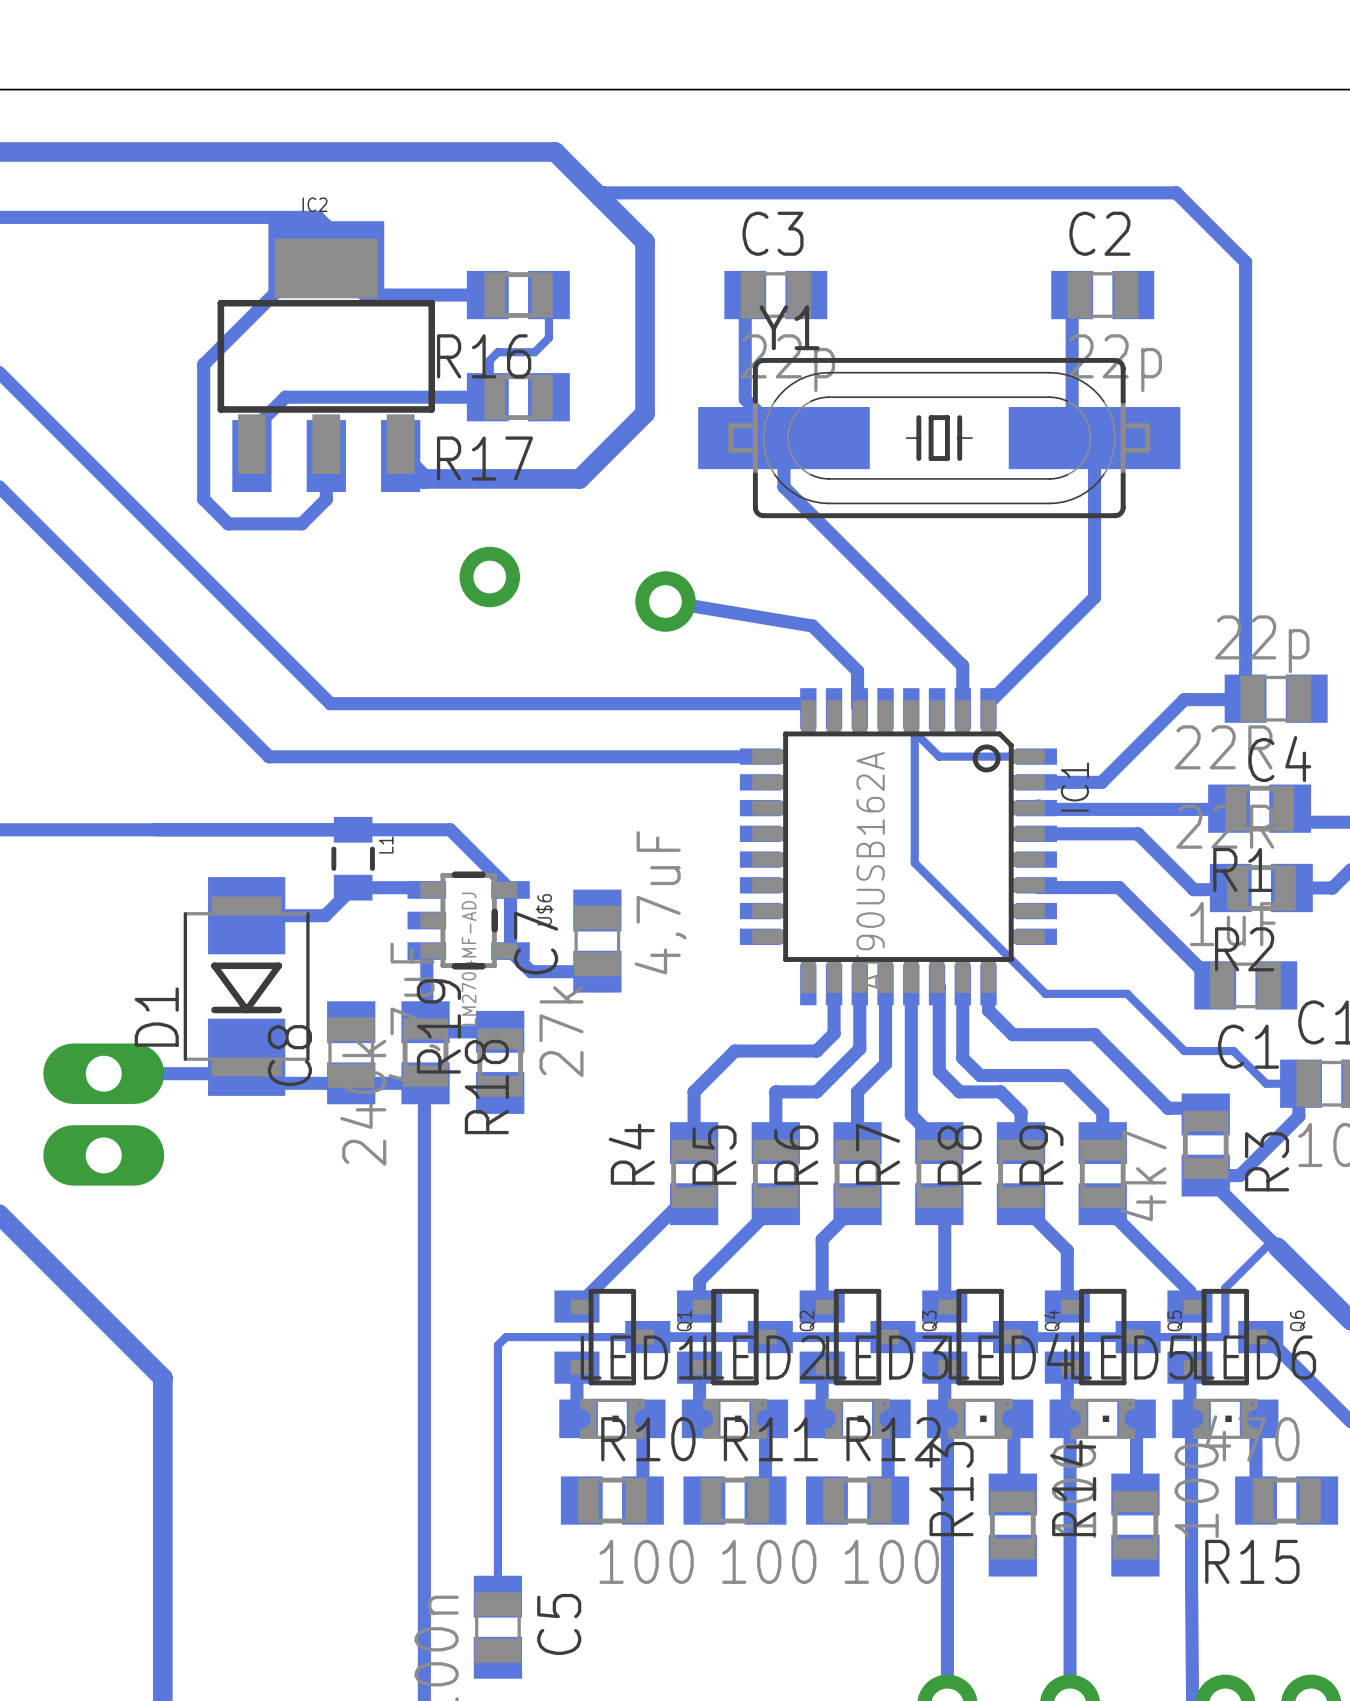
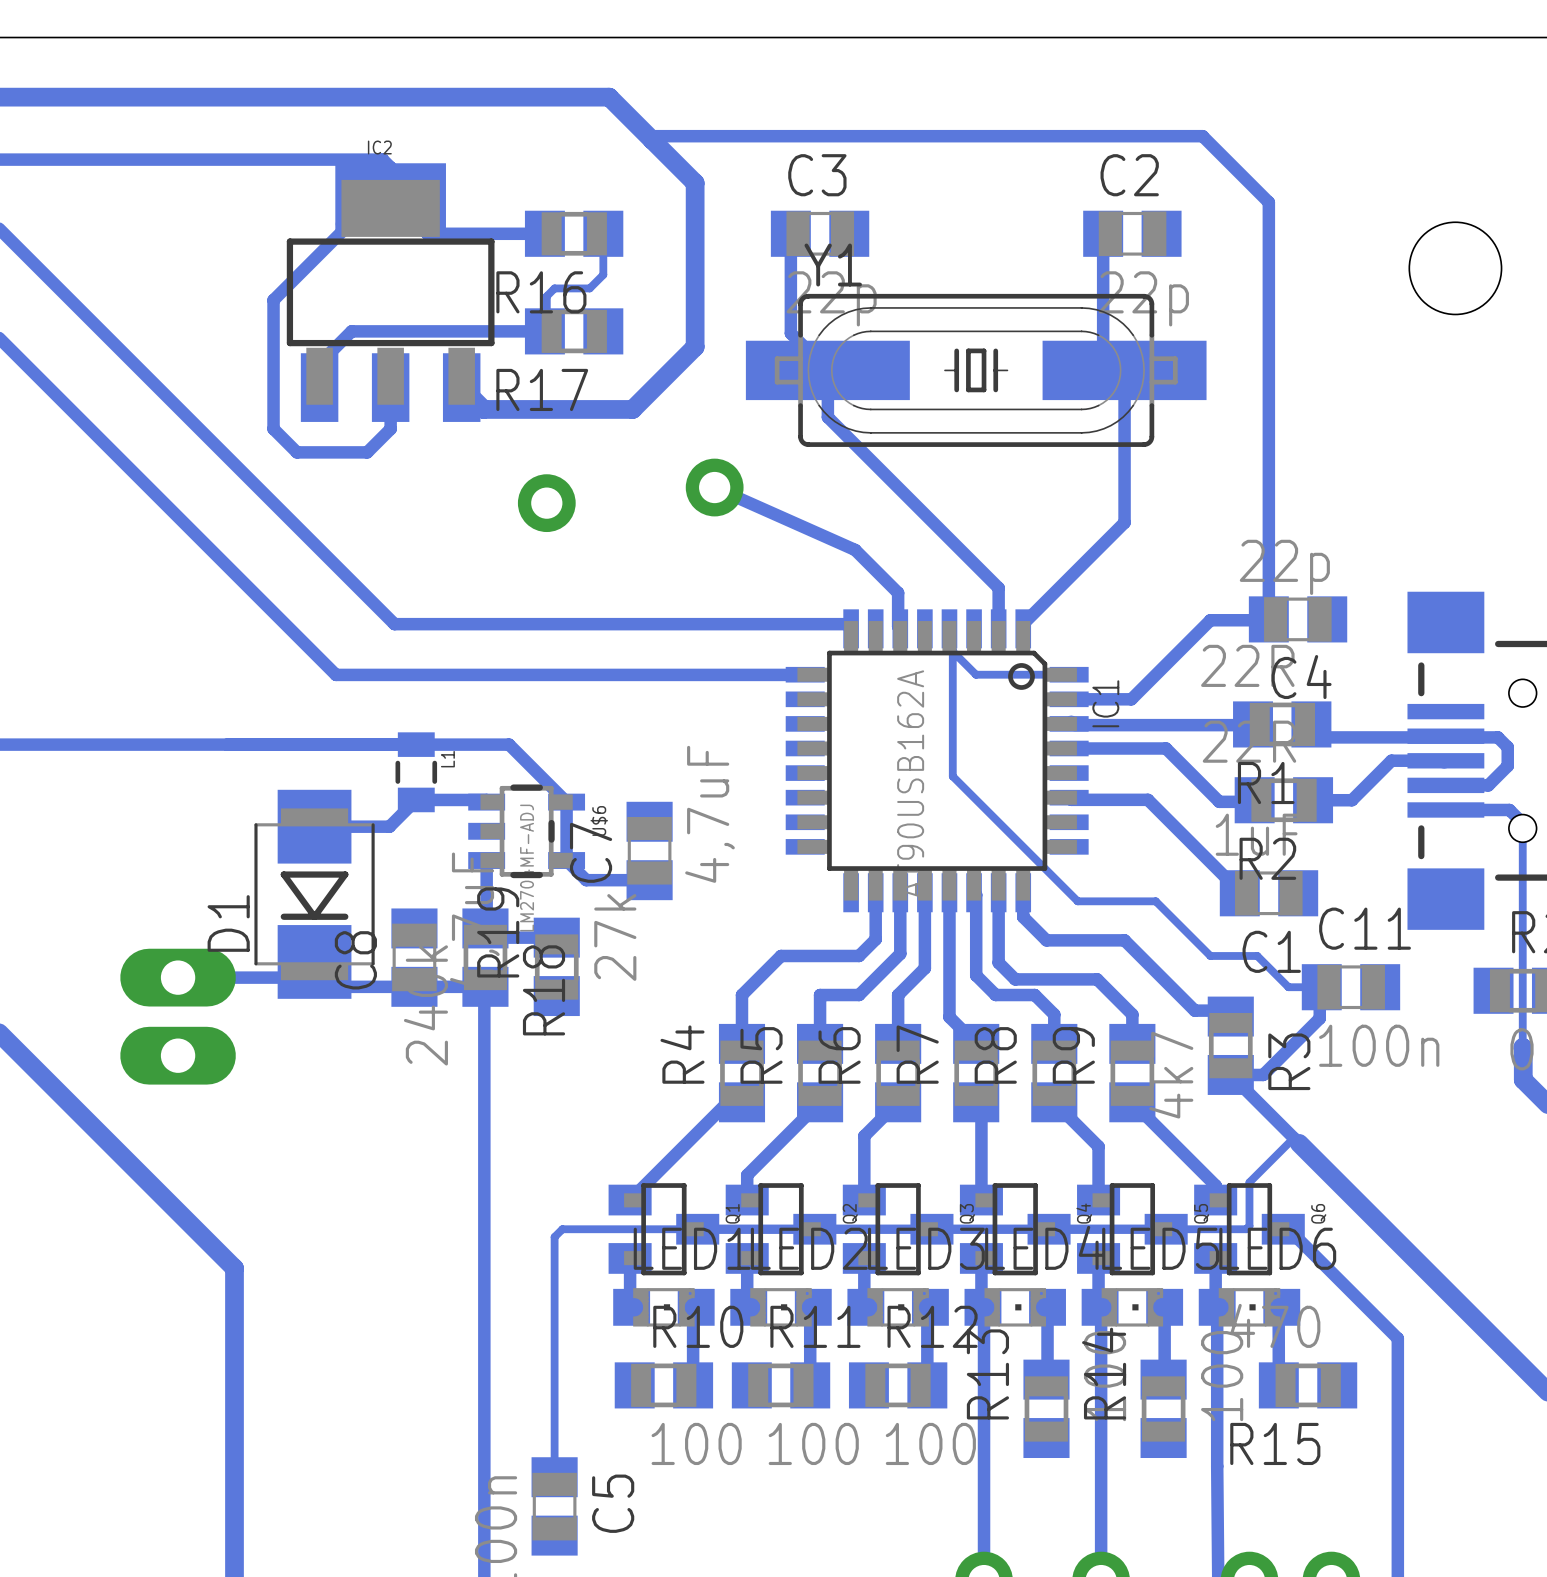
bottom track: (665, 601) (812, 626) -> (714, 487) (855, 549)
part position: (665, 601) -> (714, 487)

